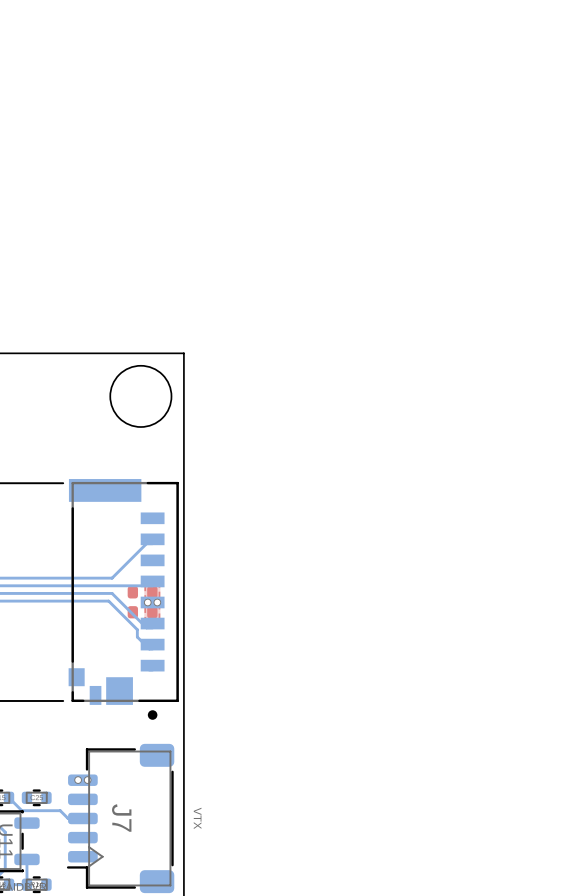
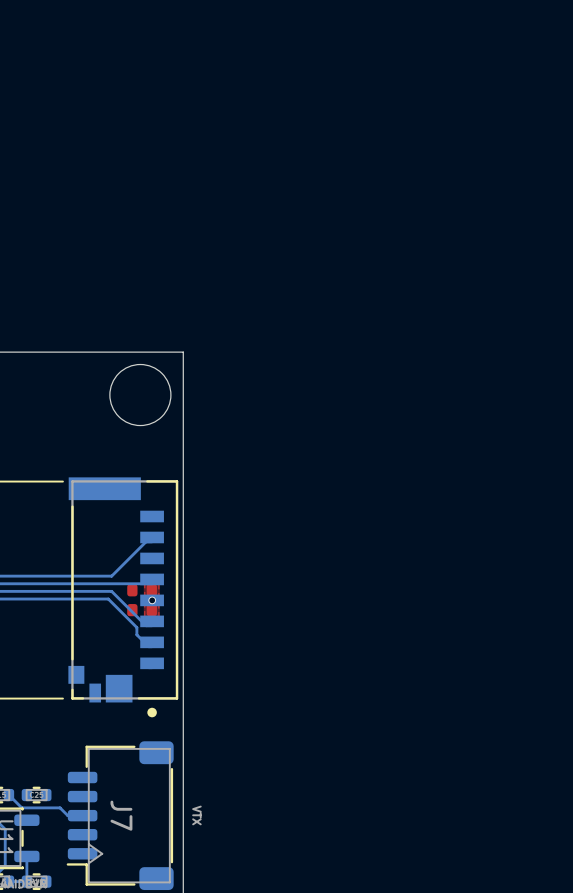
via: (147, 602) -> none
via: none -> (152, 600)
via: (157, 602) -> none
via: (78, 780) -> none
via: (87, 780) -> none

